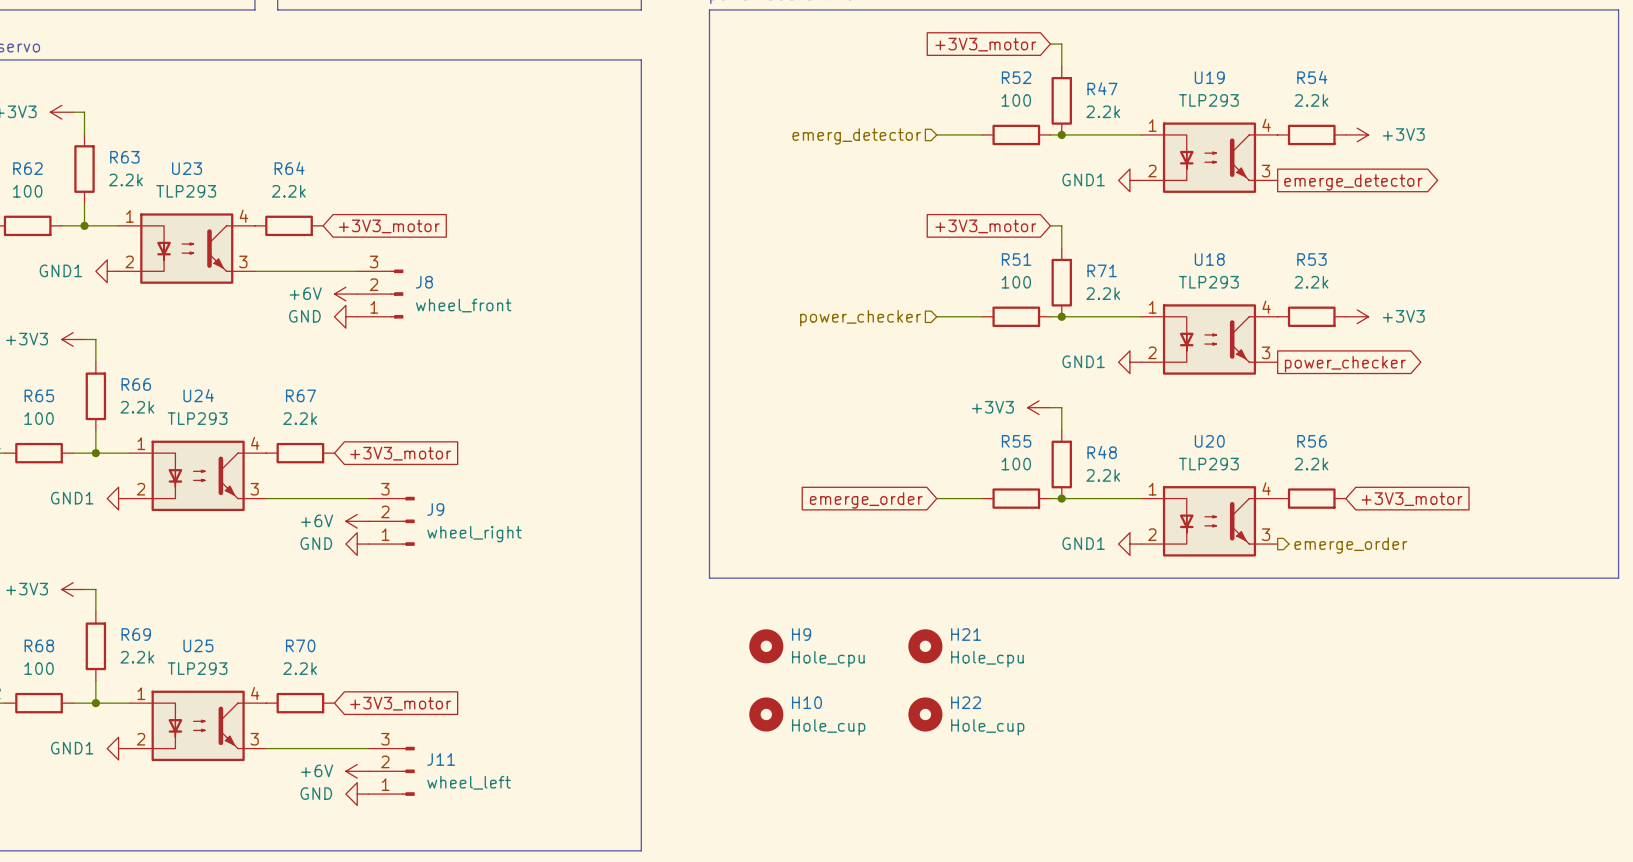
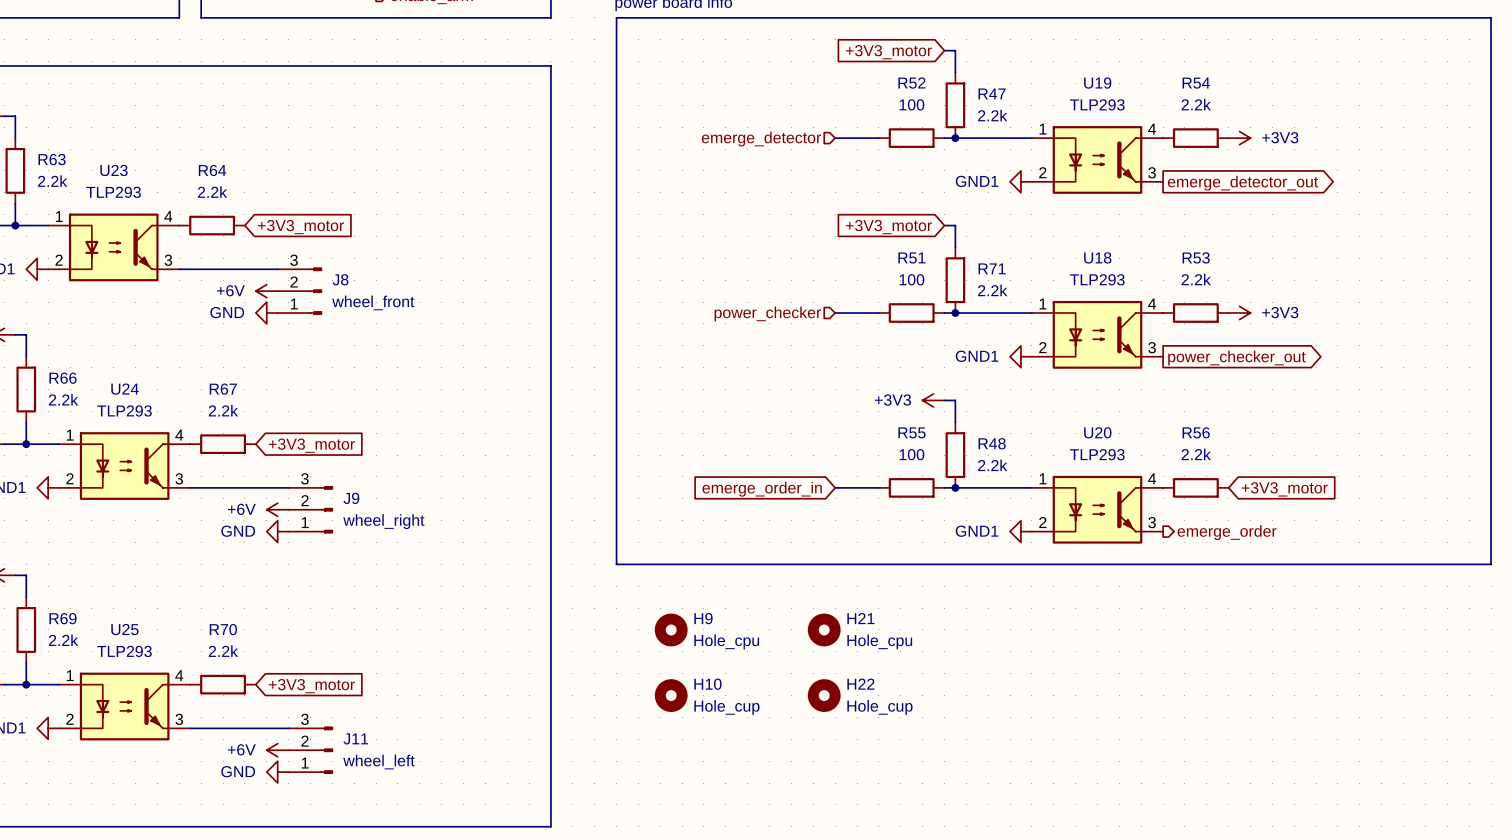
hierarchical label: emerg_detector (856, 136) -> emerge_detector (761, 139)
global label: emerge_detector (1353, 182) -> emerge_detector_out (1242, 183)
global label: power_checker (1345, 364) -> power_checker_out (1236, 358)
global label: emerge_order (866, 500) -> emerge_order_in (762, 489)

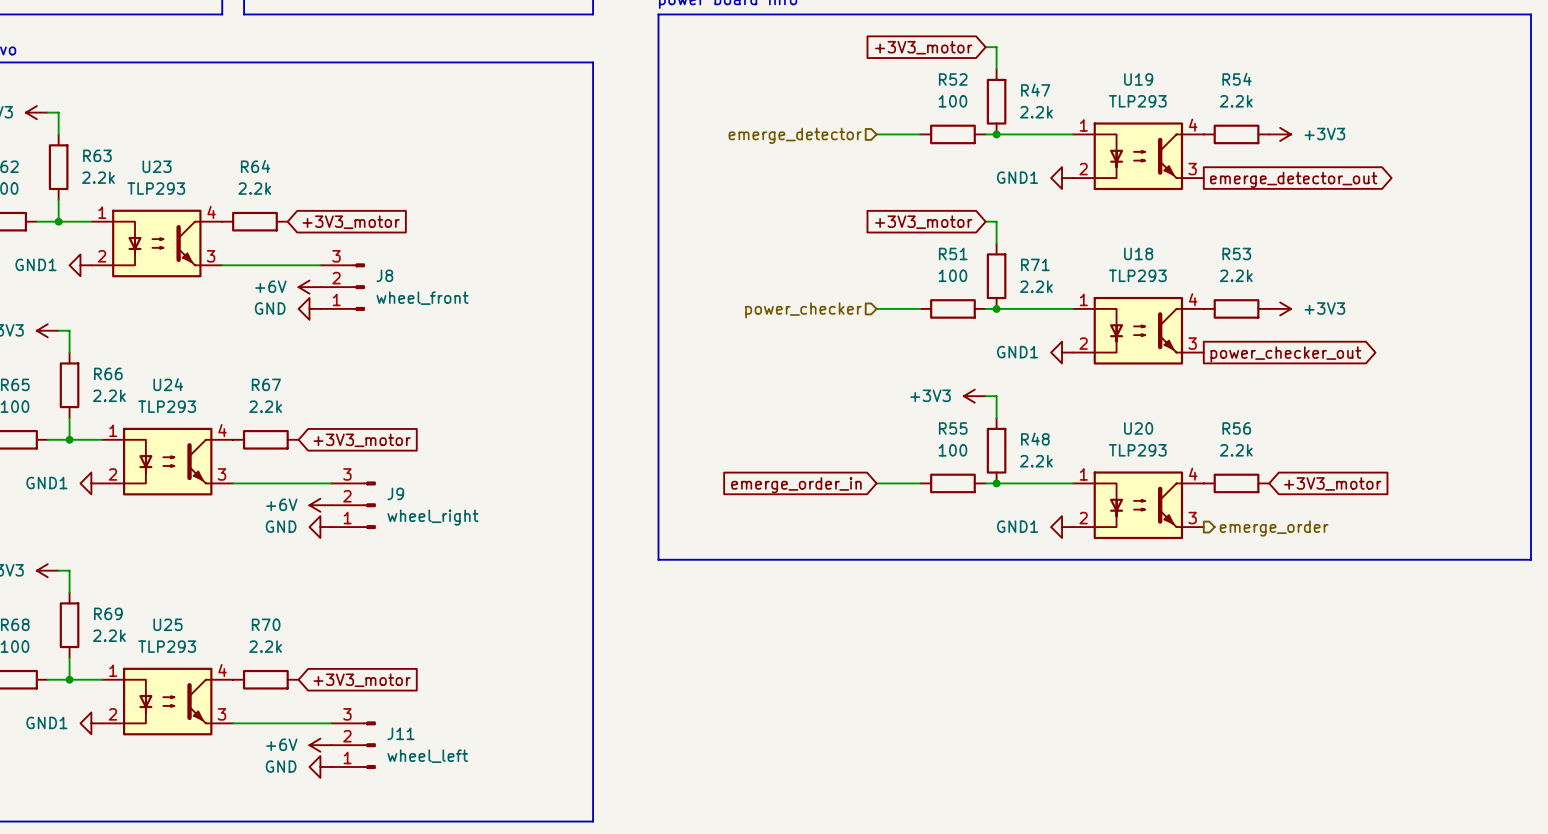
H9: Hole_cpu (671, 629) -> none
H21: Hole_cpu (824, 629) -> none
H10: Hole_cup (671, 695) -> none
H22: Hole_cup (824, 695) -> none

